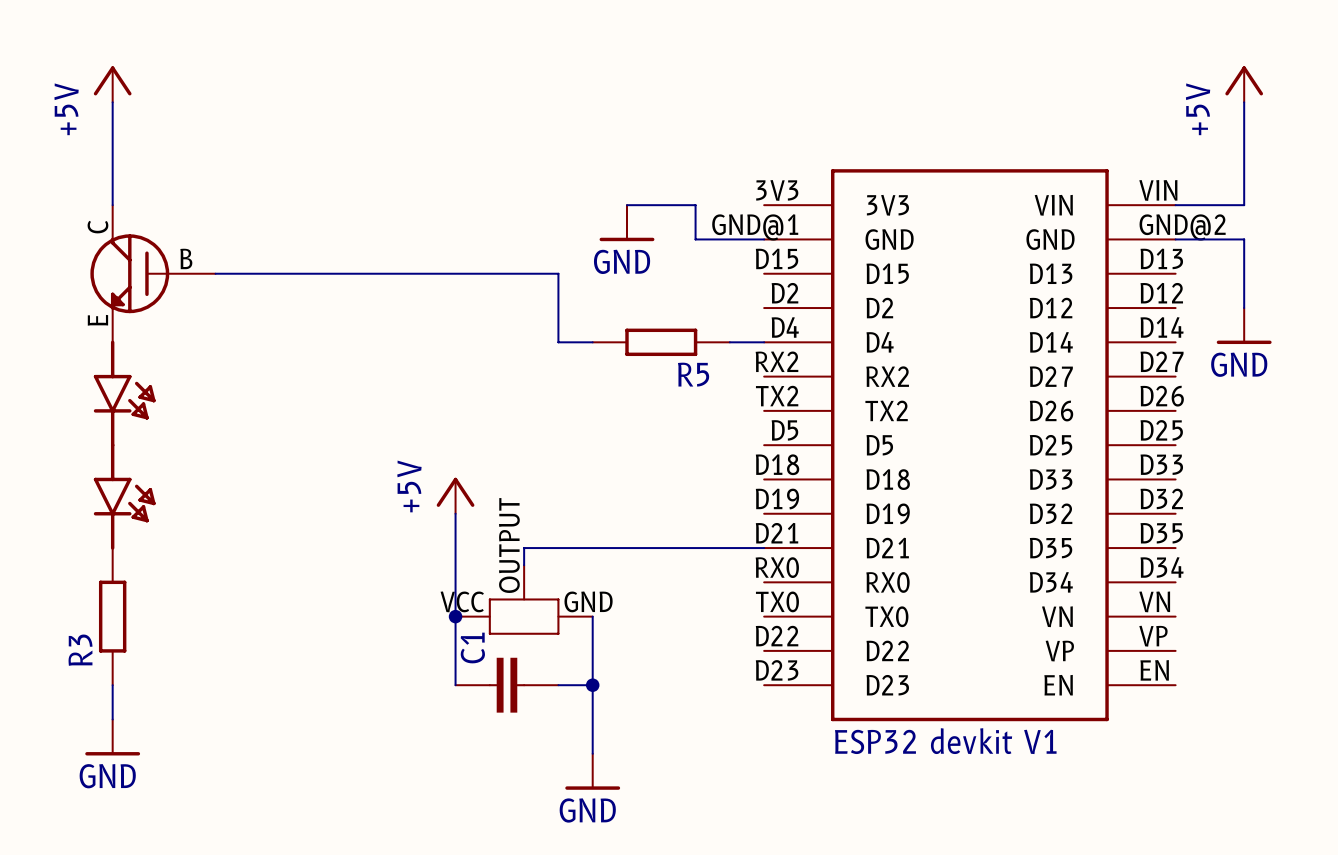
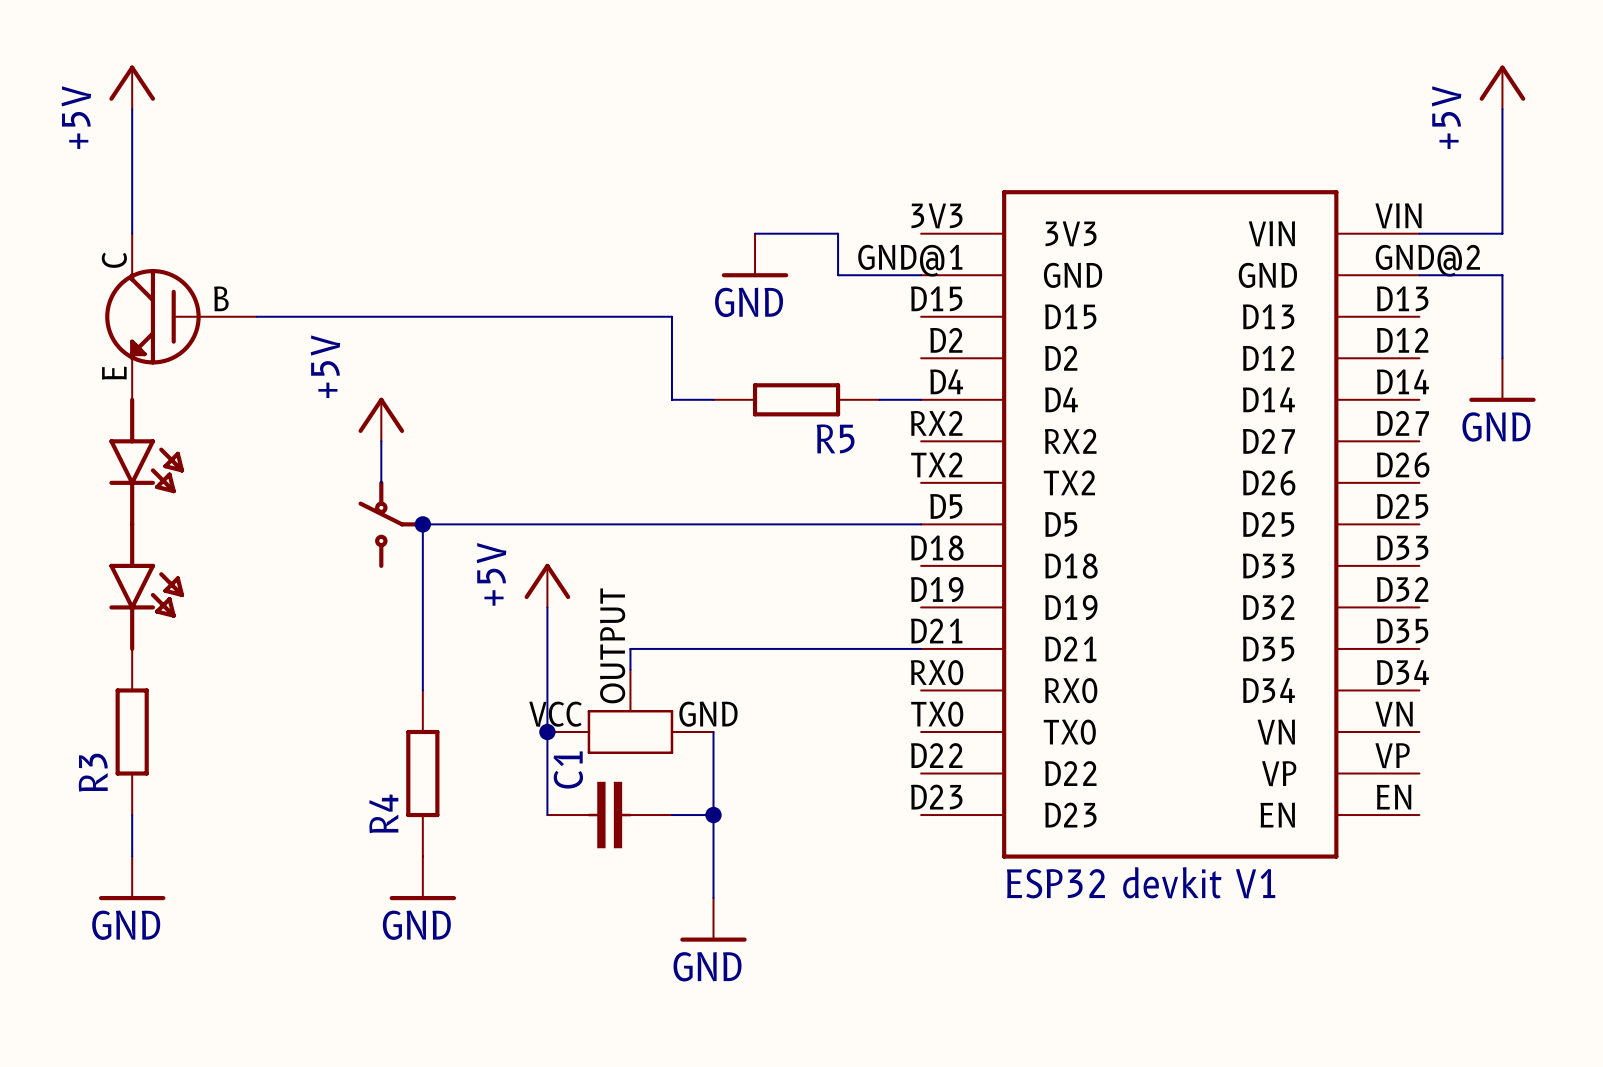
power symbol: none -> +5V (381, 419)
wire: none -> (381, 441) (381, 482)
part: none -> (391, 524)
junction: none -> (422, 524)
wire: none -> (921, 524) (422, 524) (422, 690)
R4: none -> (422, 773)
power symbol: none -> GND (422, 878)

